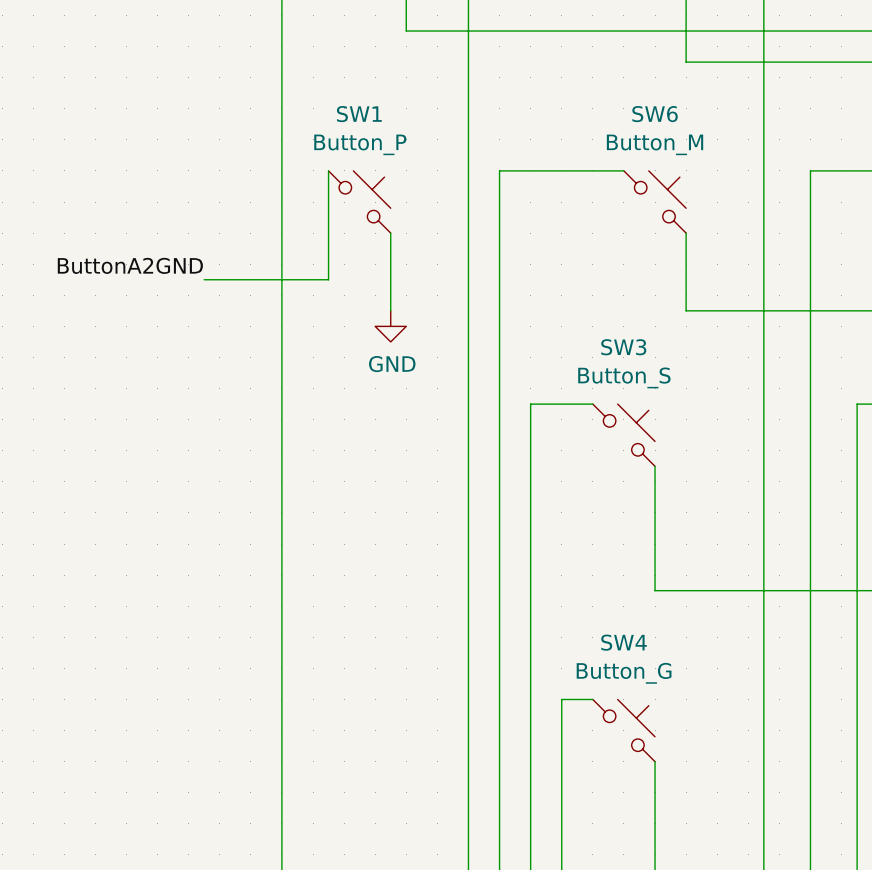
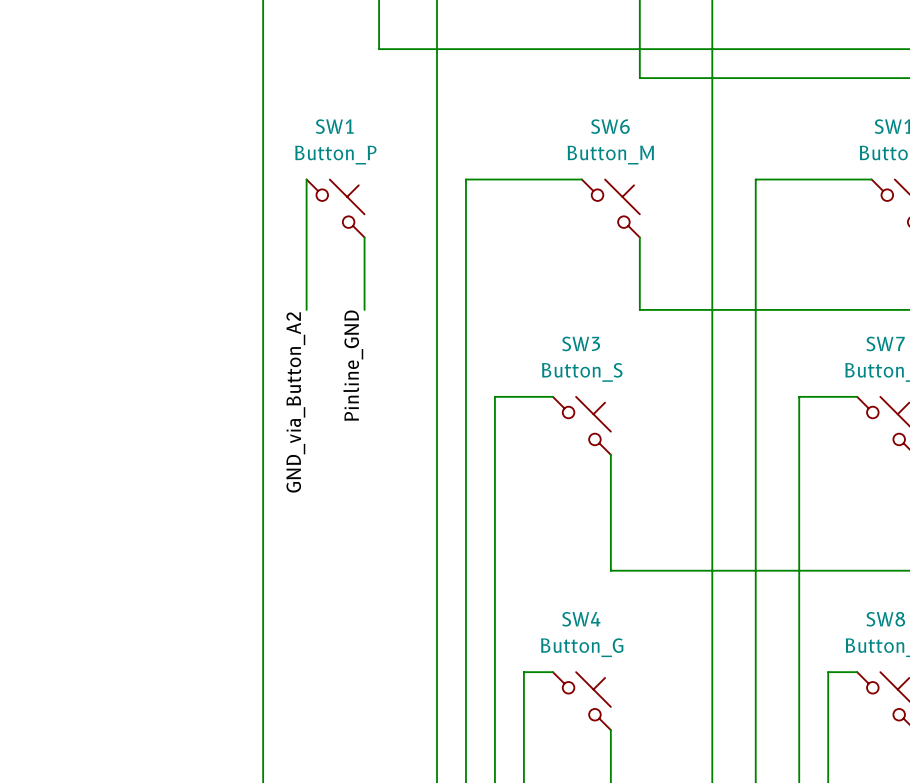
label: ButtonA2GND (130, 265) -> none
wire: (204, 279) (328, 279) -> (306, 309) (306, 280)
power symbol: GND (390, 326) -> none
label: none -> Pinline_GND (353, 365)
label: none -> GND_via_Button_A2 (295, 402)

